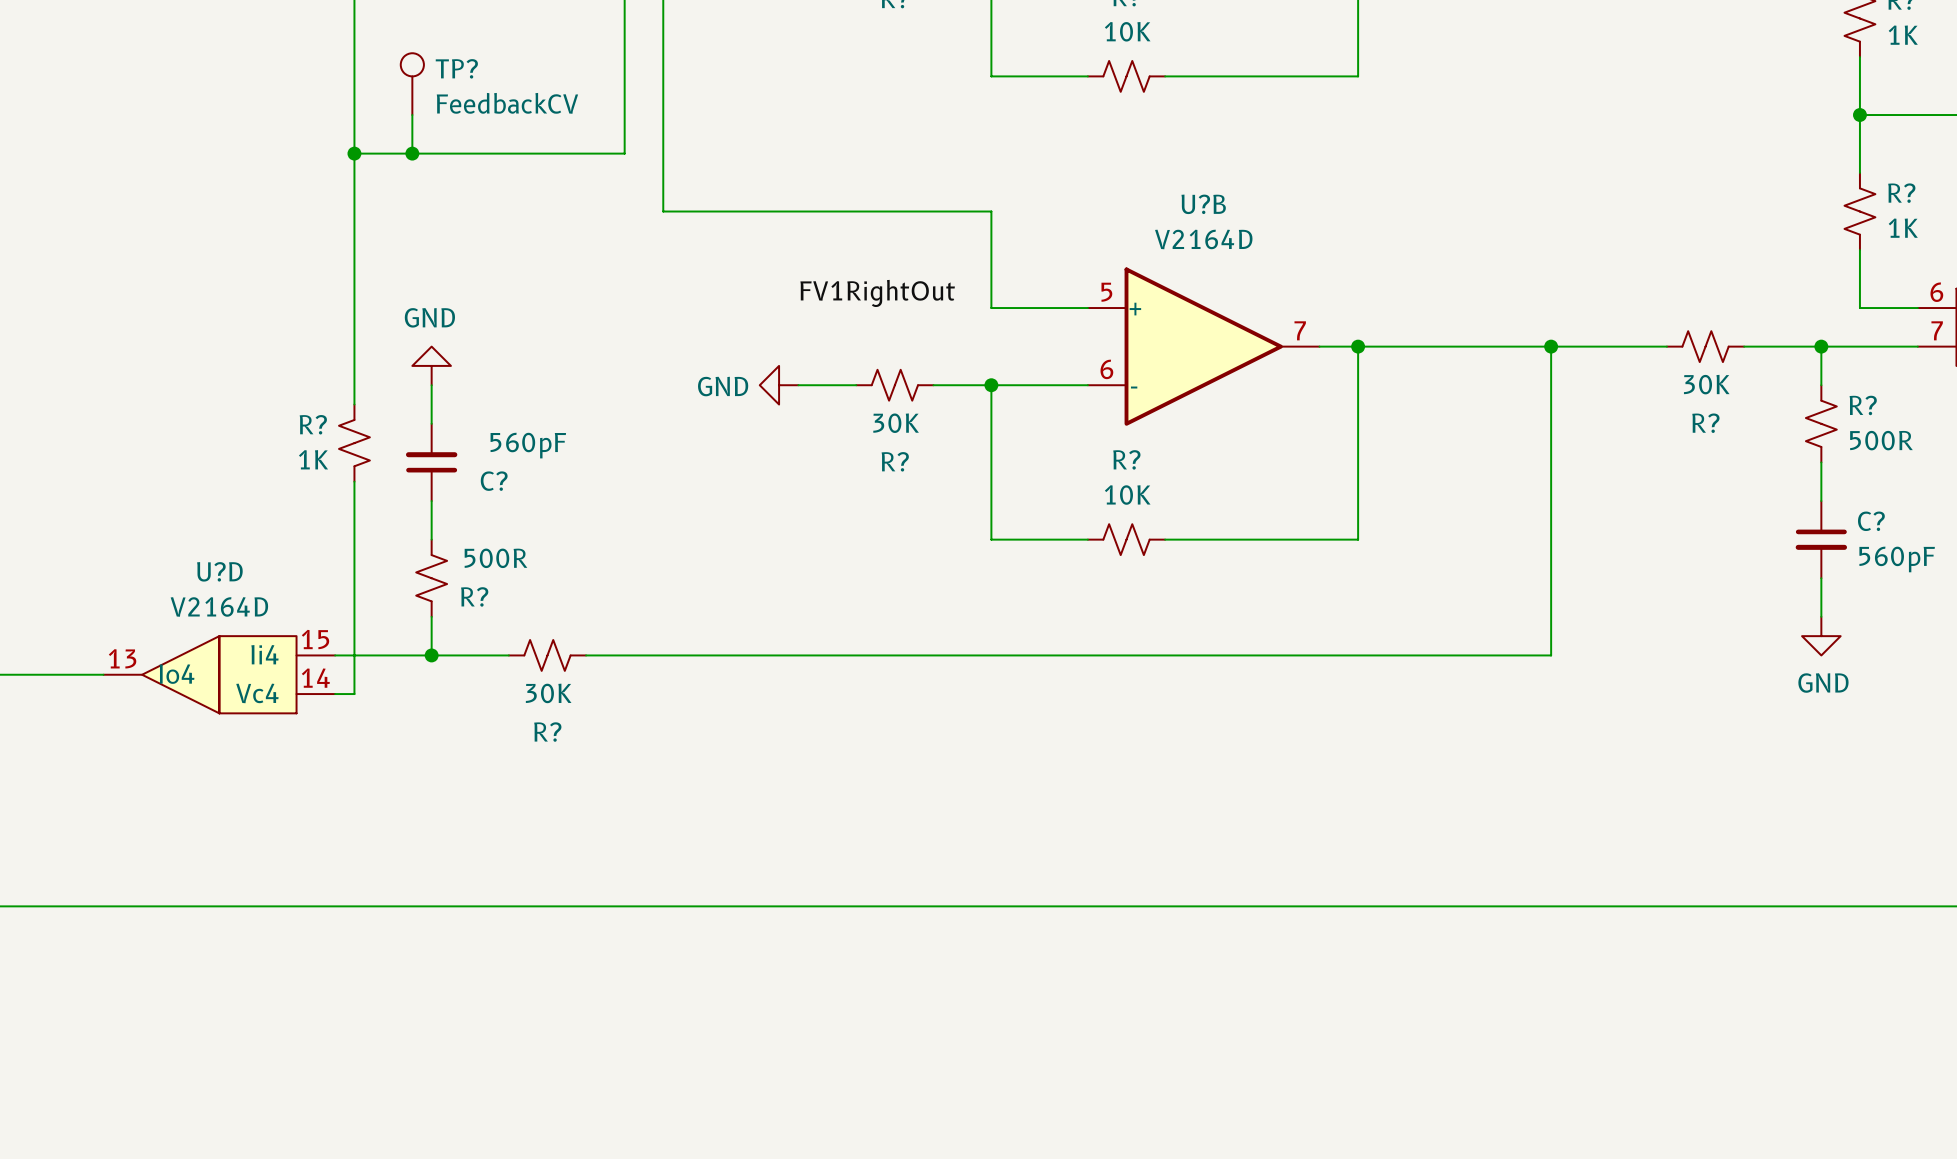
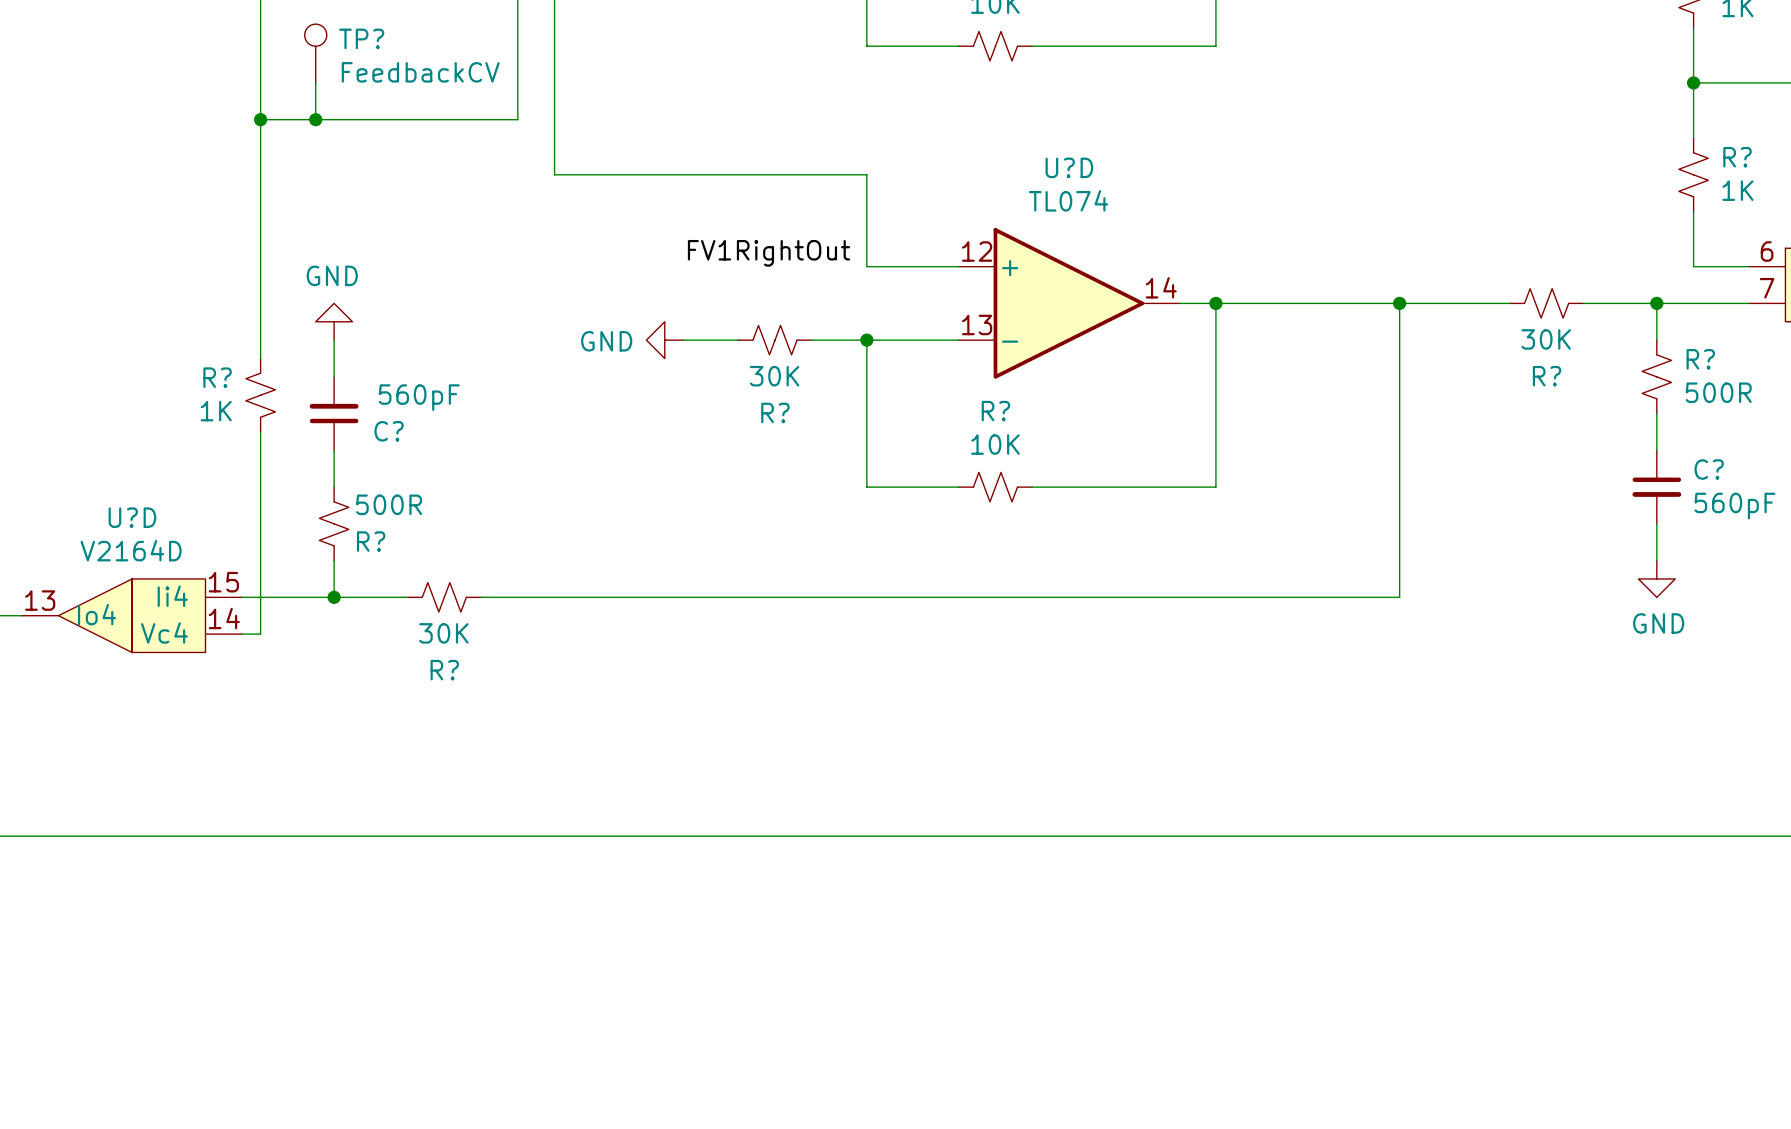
U?B name: U?B (1203, 204) -> U?D (1069, 167)
U?B value: V2164D (1203, 239) -> TL074 (1068, 200)
U?B pin number: 5 (1106, 292) -> 12 (977, 251)
U?B pin number: 7 (1300, 330) -> 14 (1161, 287)
U?B pin number: 6 (1106, 369) -> 13 (977, 324)

